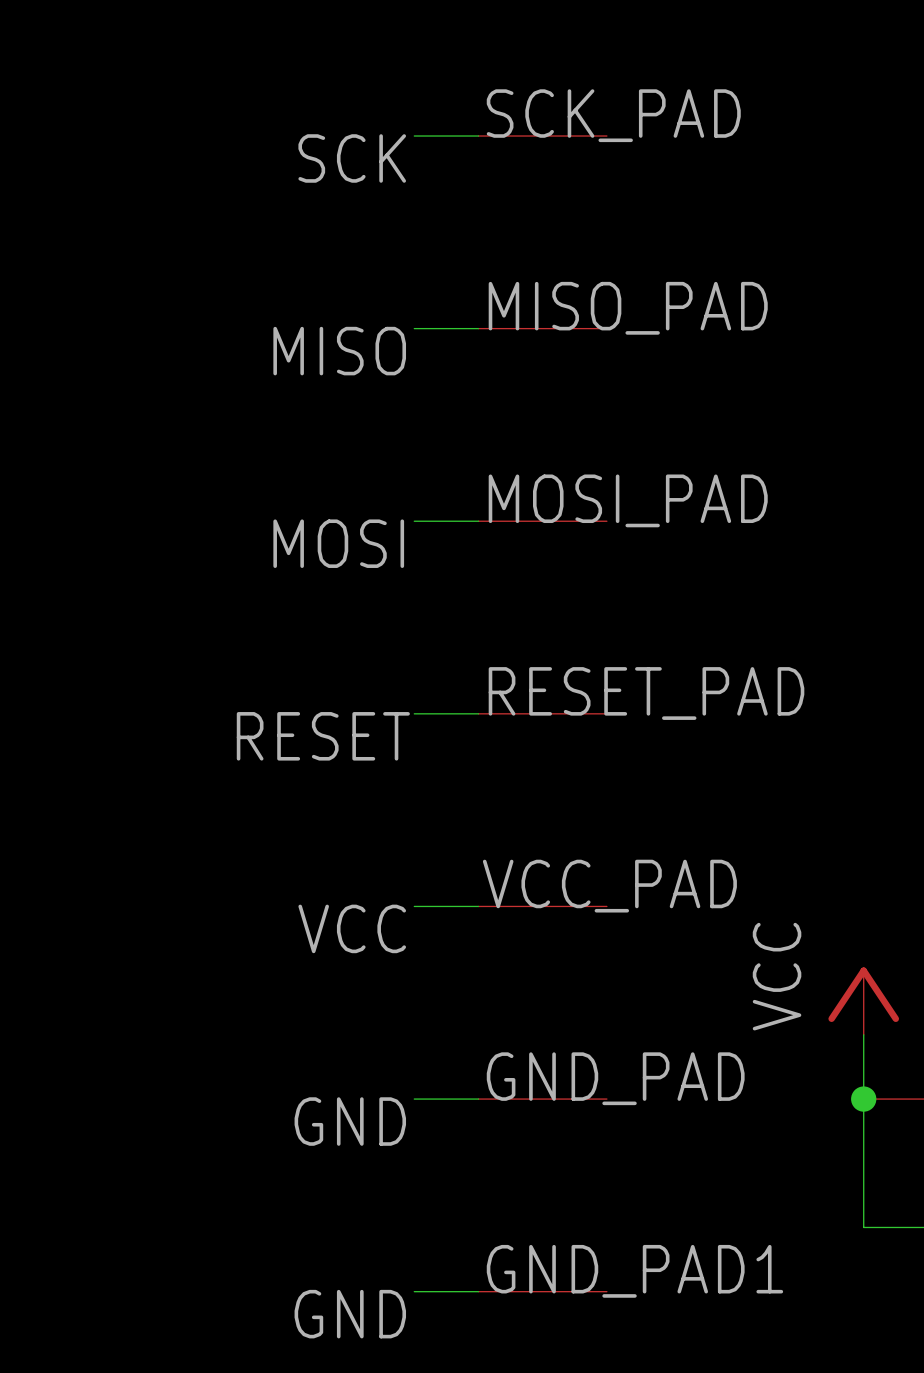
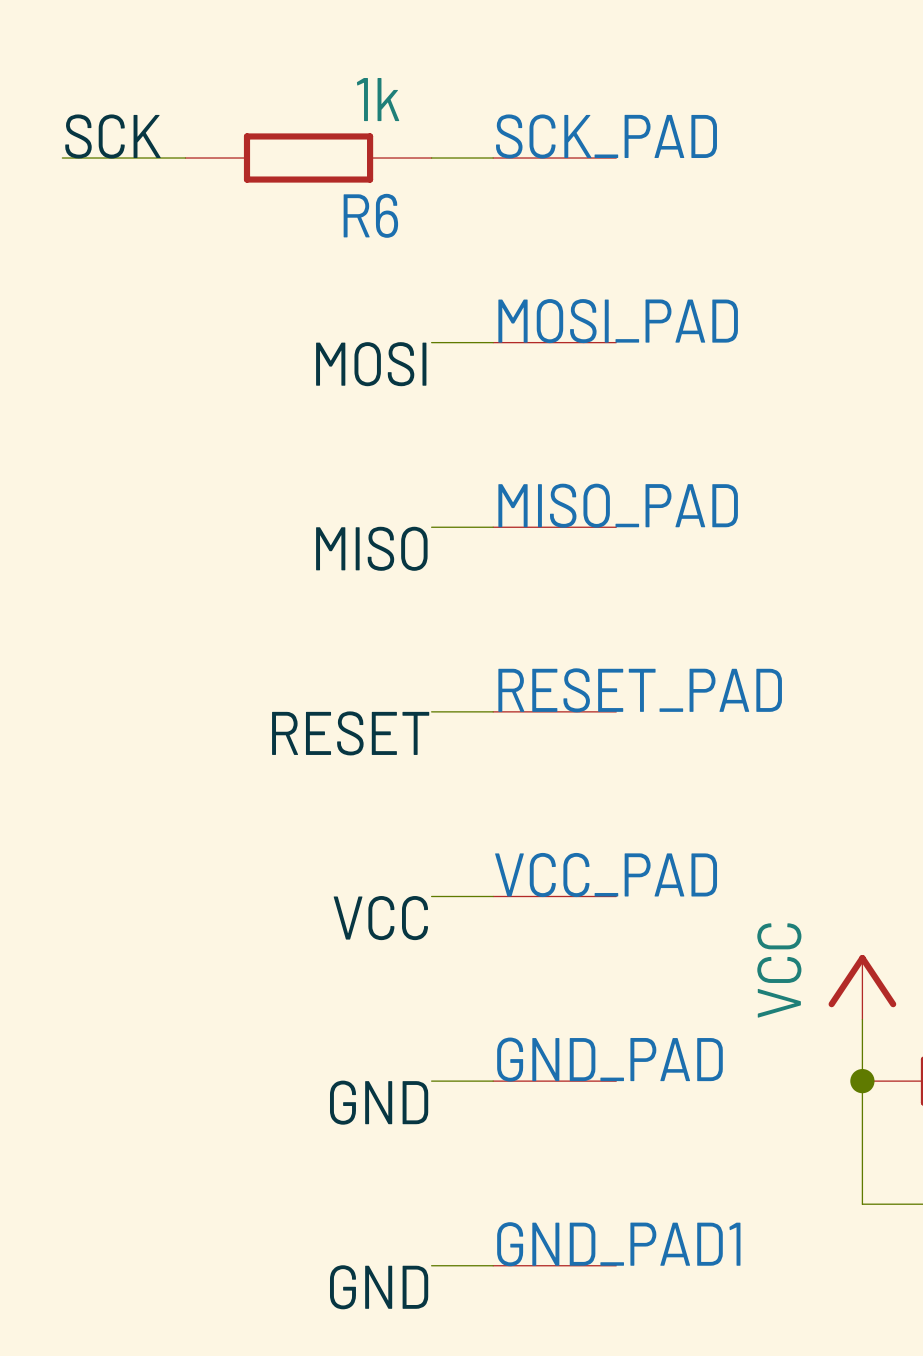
wire: none -> (62, 158) (185, 158)
R6: none -> 1k (308, 158)
label position: SCK (352, 158) -> SCK (112, 136)
MISO_PAD name: MISO_PAD (628, 308) -> MOSI_PAD (618, 321)
label: MISO (339, 351) -> MOSI (371, 364)
MOSI_PAD name: MOSI_PAD (628, 500) -> MISO_PAD (618, 505)
label: MOSI (338, 543) -> MISO (371, 548)

